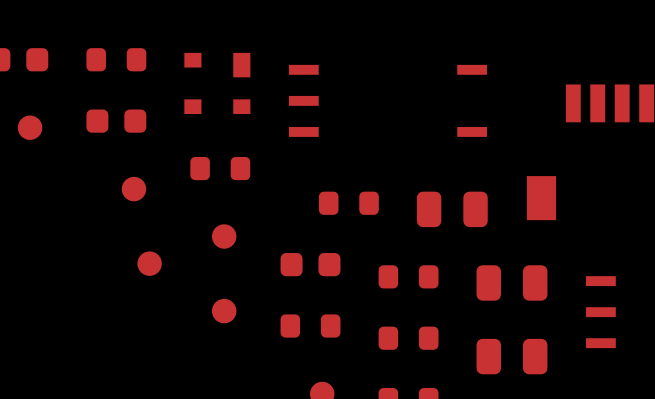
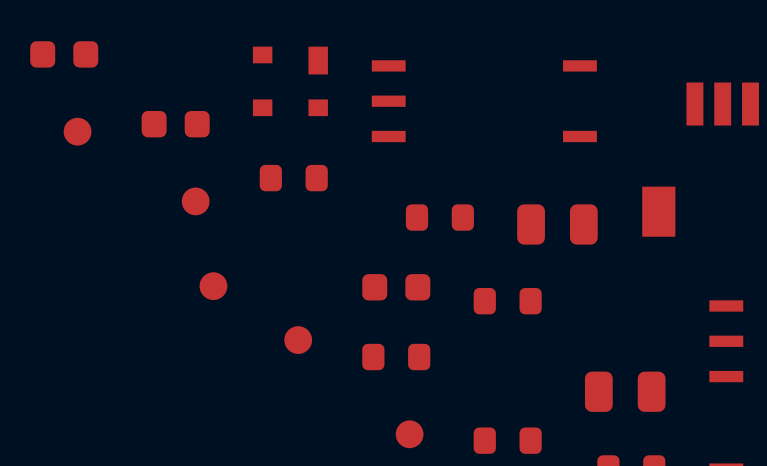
part: (116, 59) -> none
part: (224, 236) -> none
part: (511, 282) -> none
part: (408, 338) -> none

